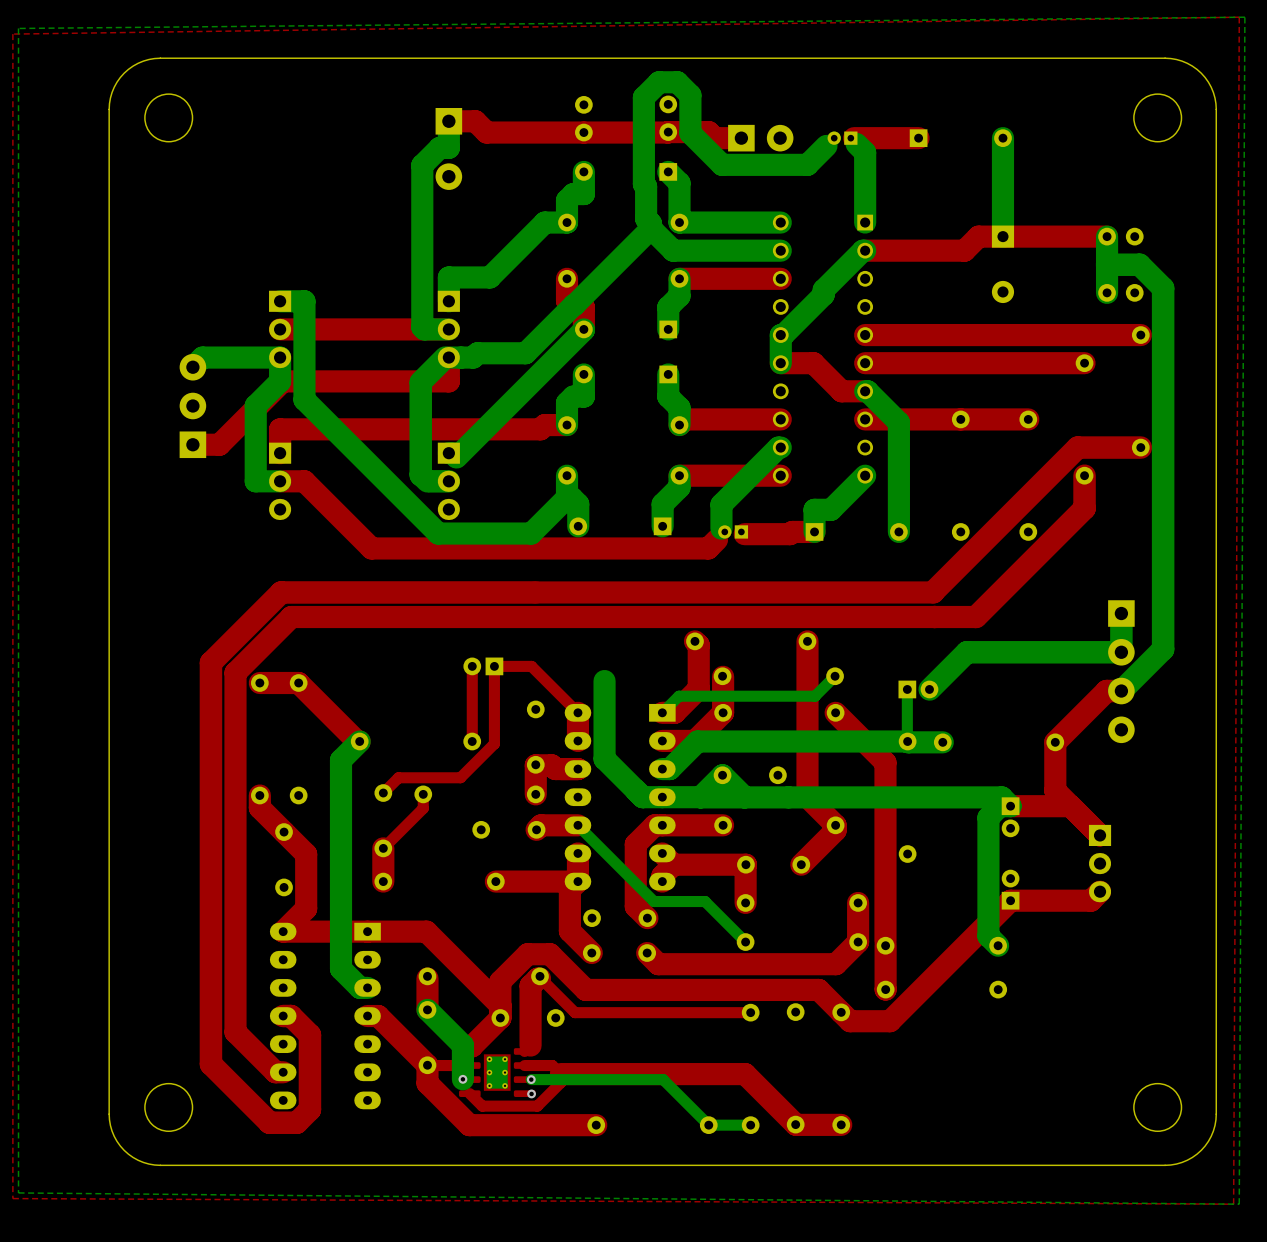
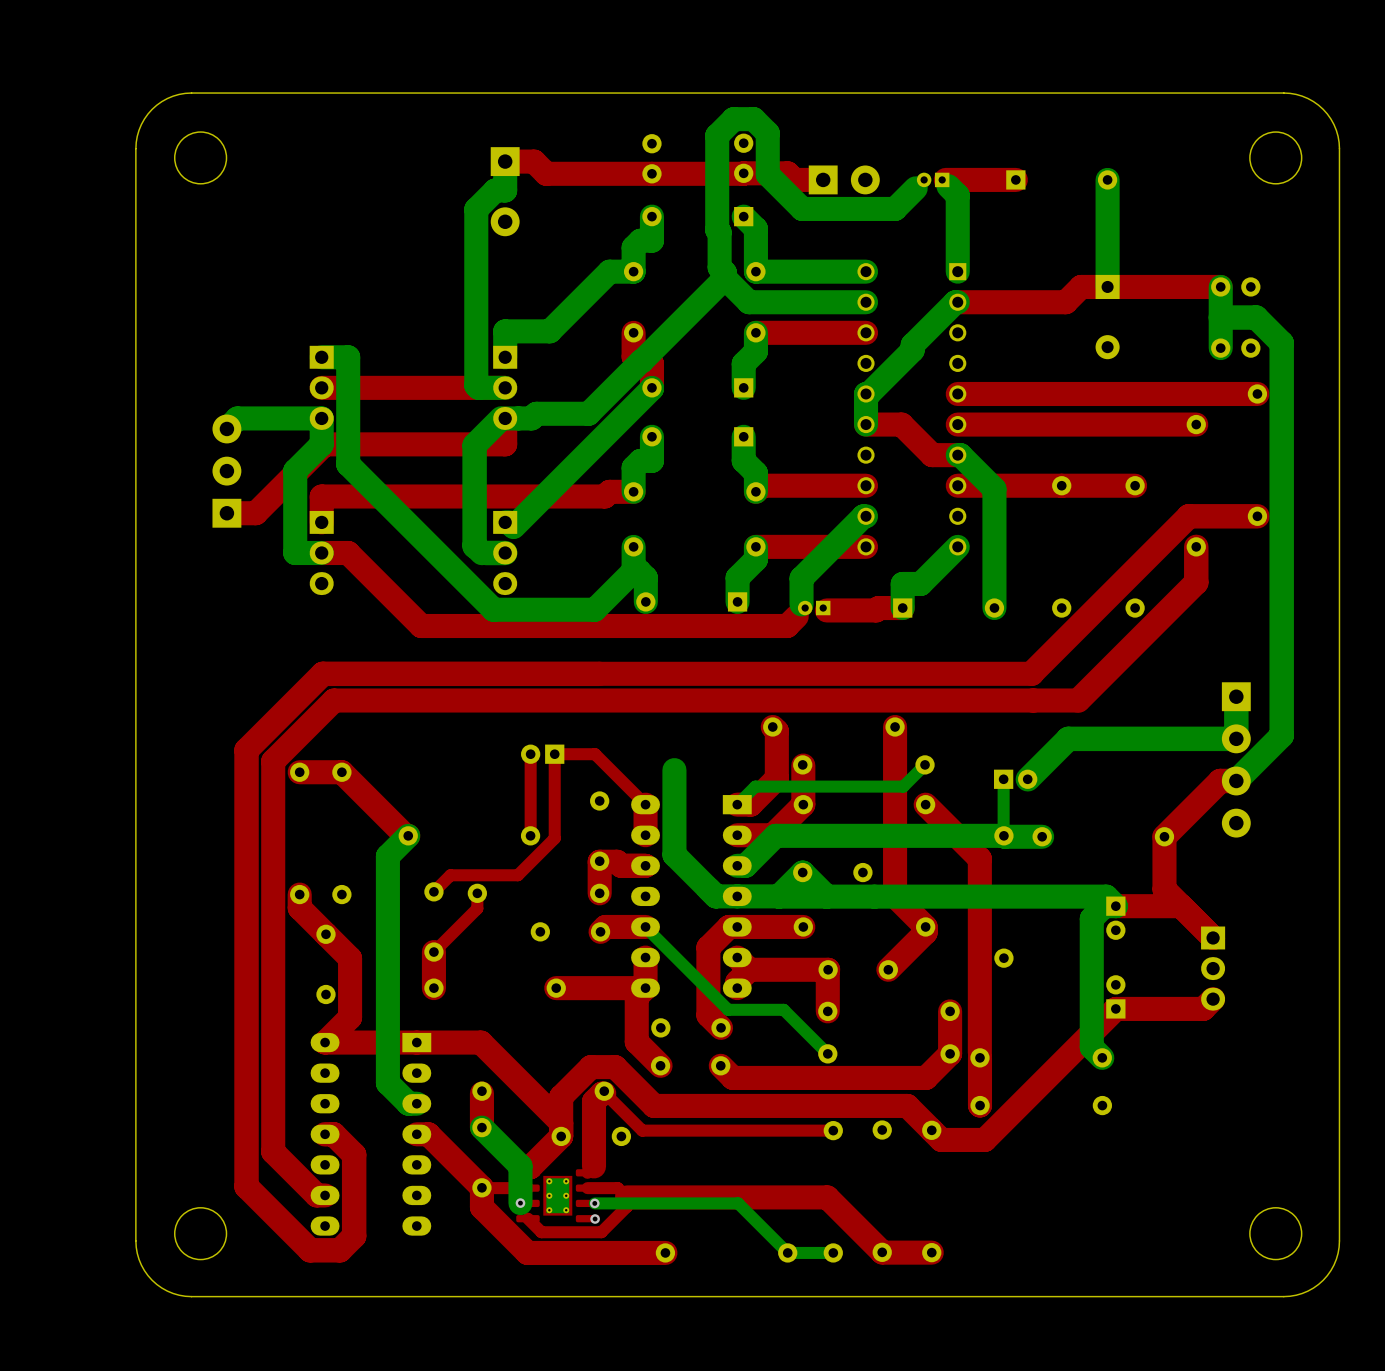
top zone outline: (1239, 17) (1233, 1204) (12, 1198) (12, 34) (1239, 17) -> none
bottom zone outline: (1244, 17) (1239, 1204) (18, 1192) (18, 28) (1244, 17) -> none

